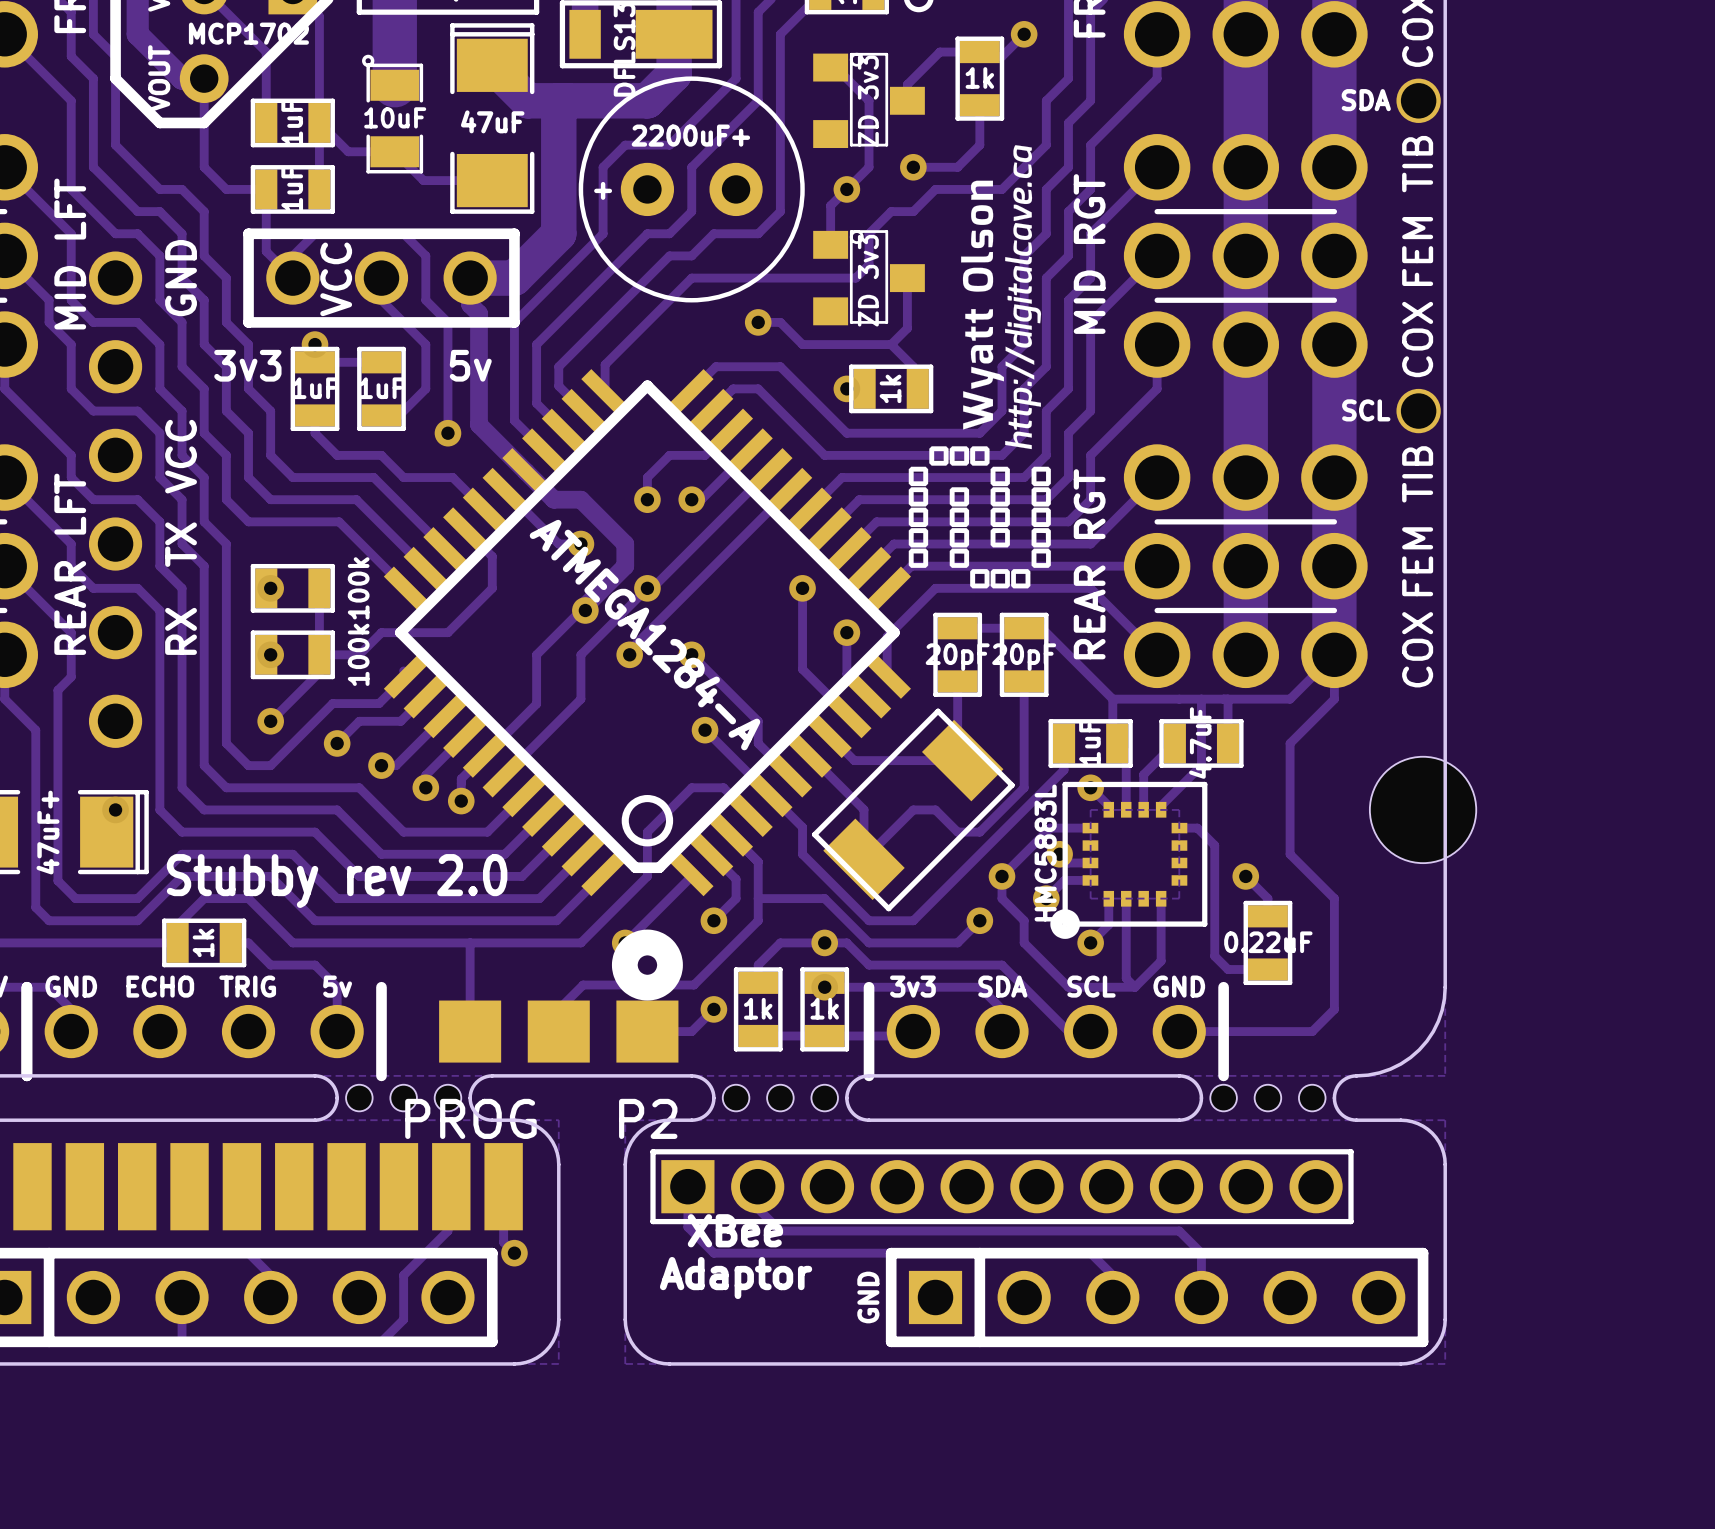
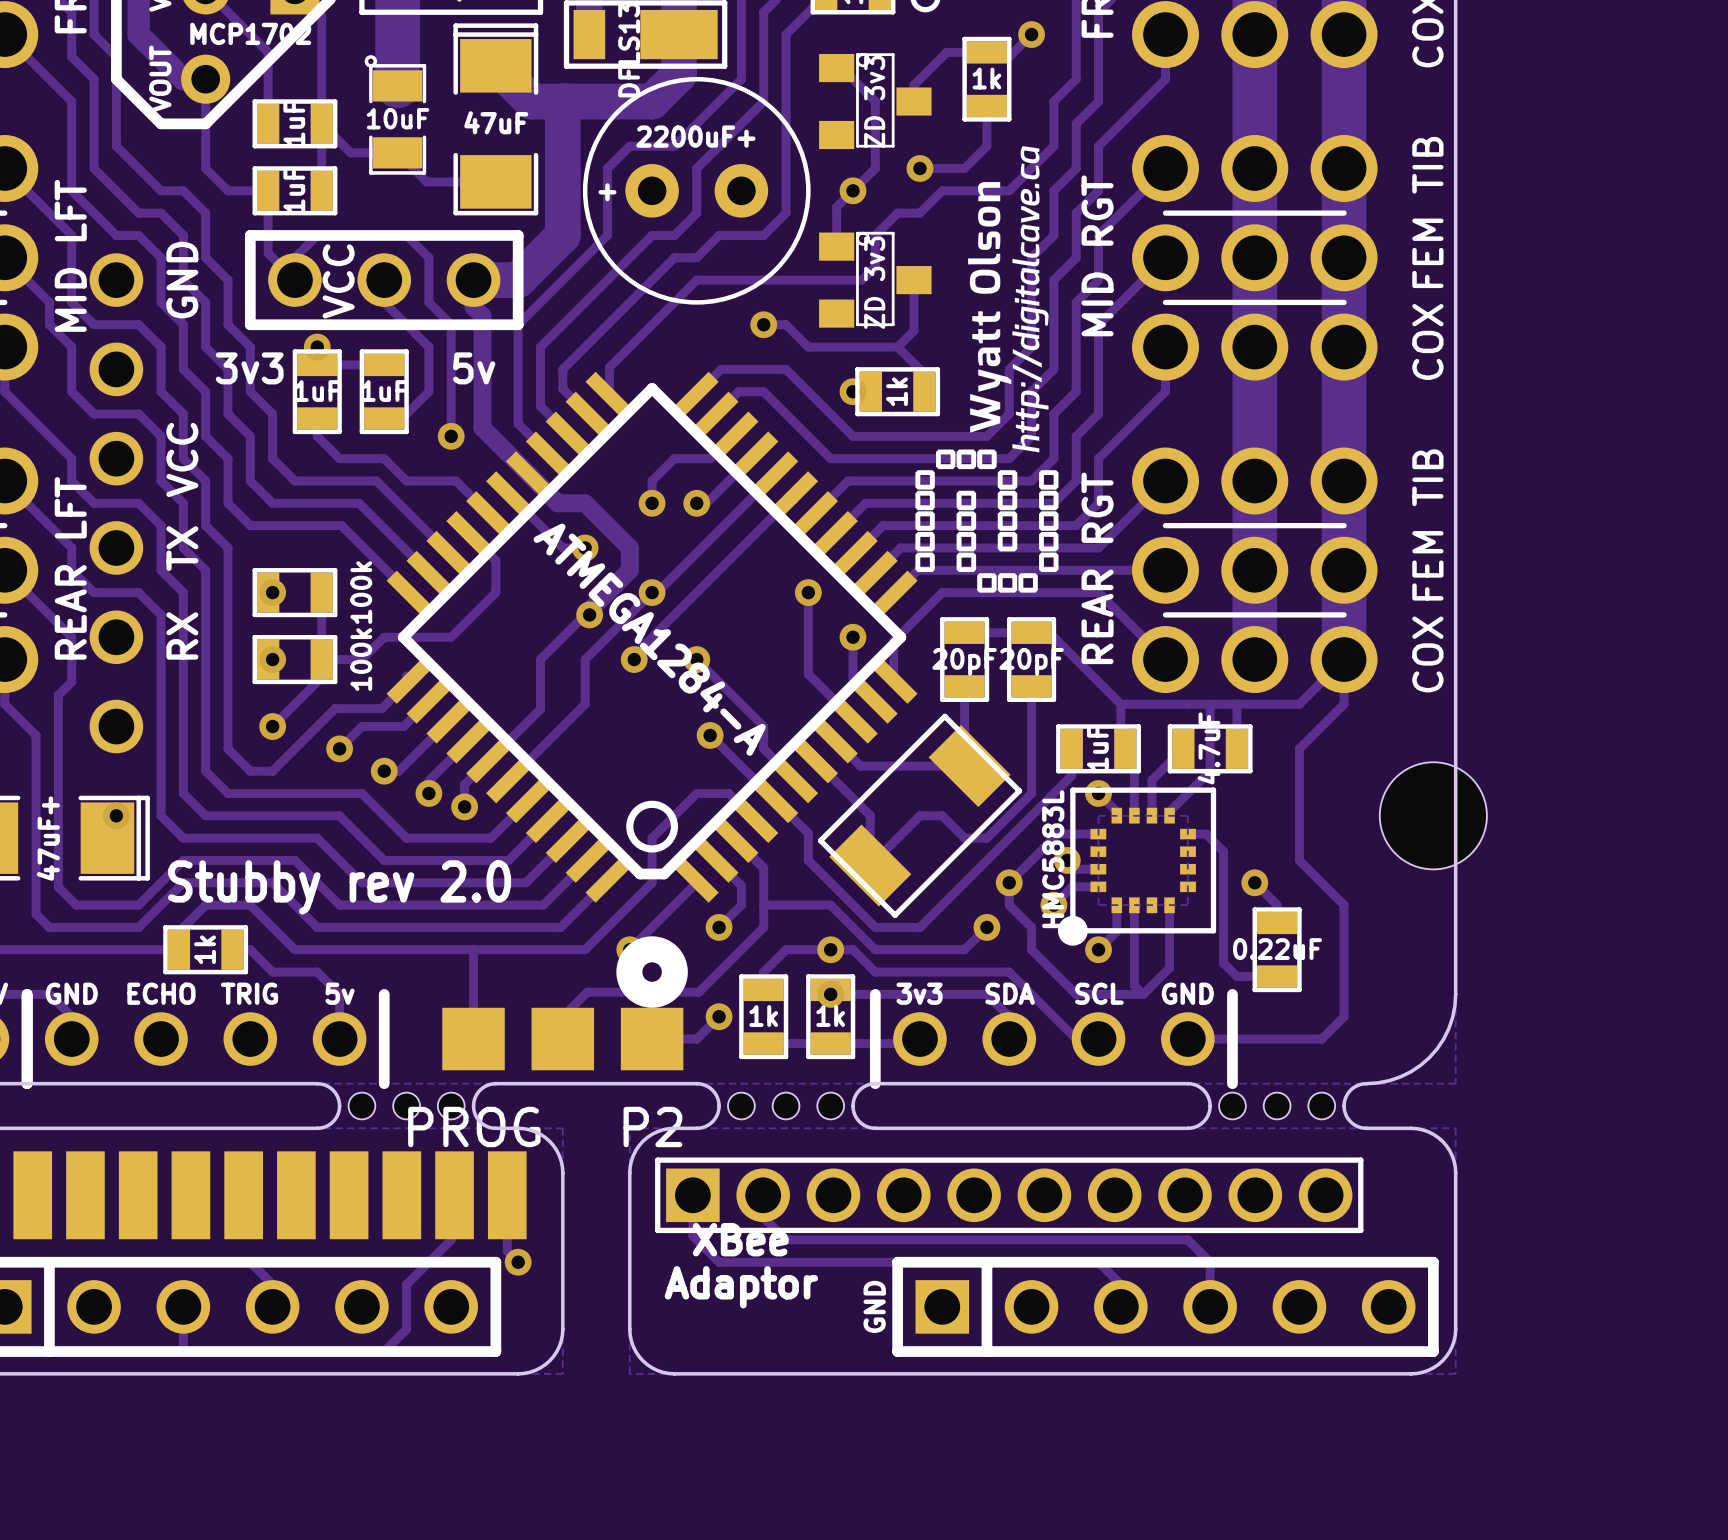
text: SDA (1366, 100) -> none
part: (1418, 100) -> none
text: SCL (1366, 410) -> none
part: (1418, 411) -> none

